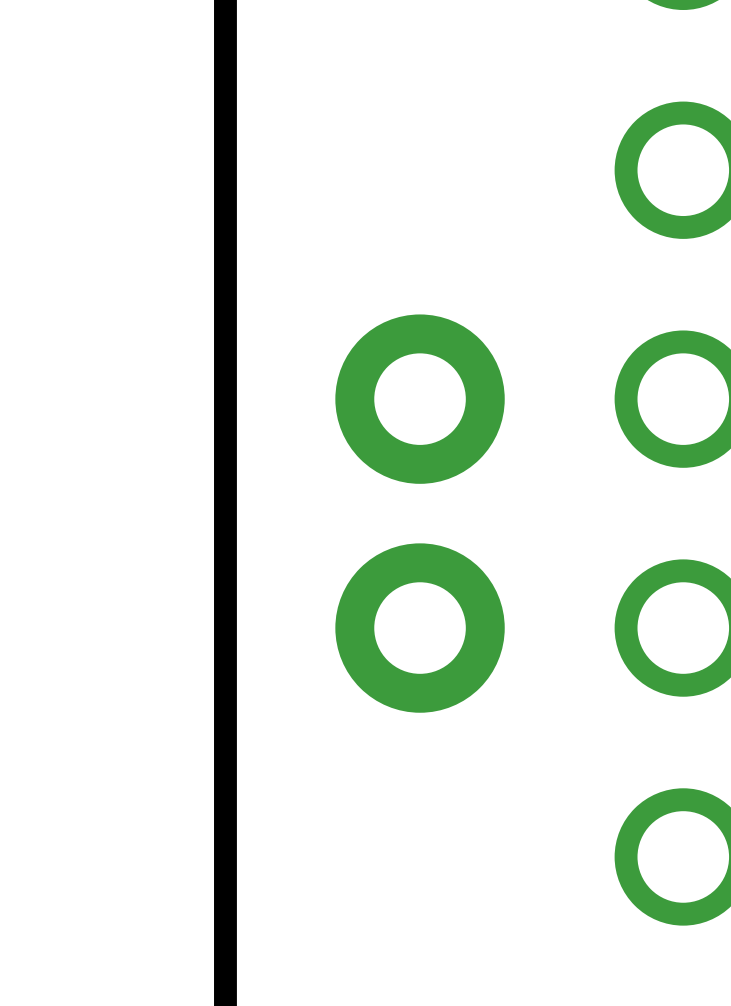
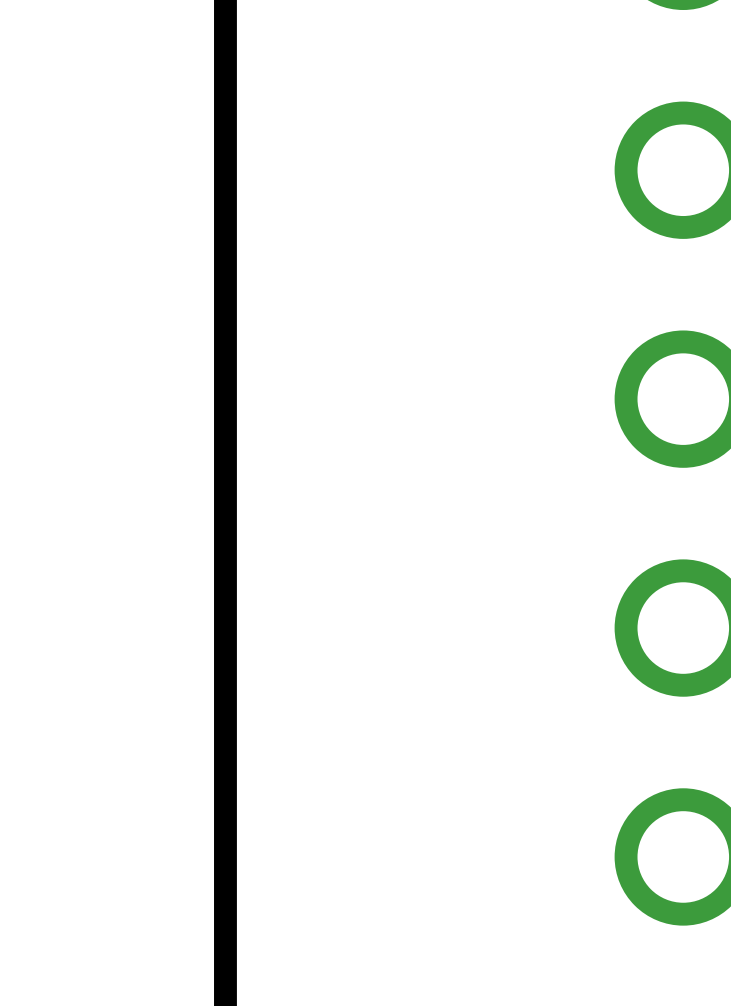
part: (420, 513) -> none

